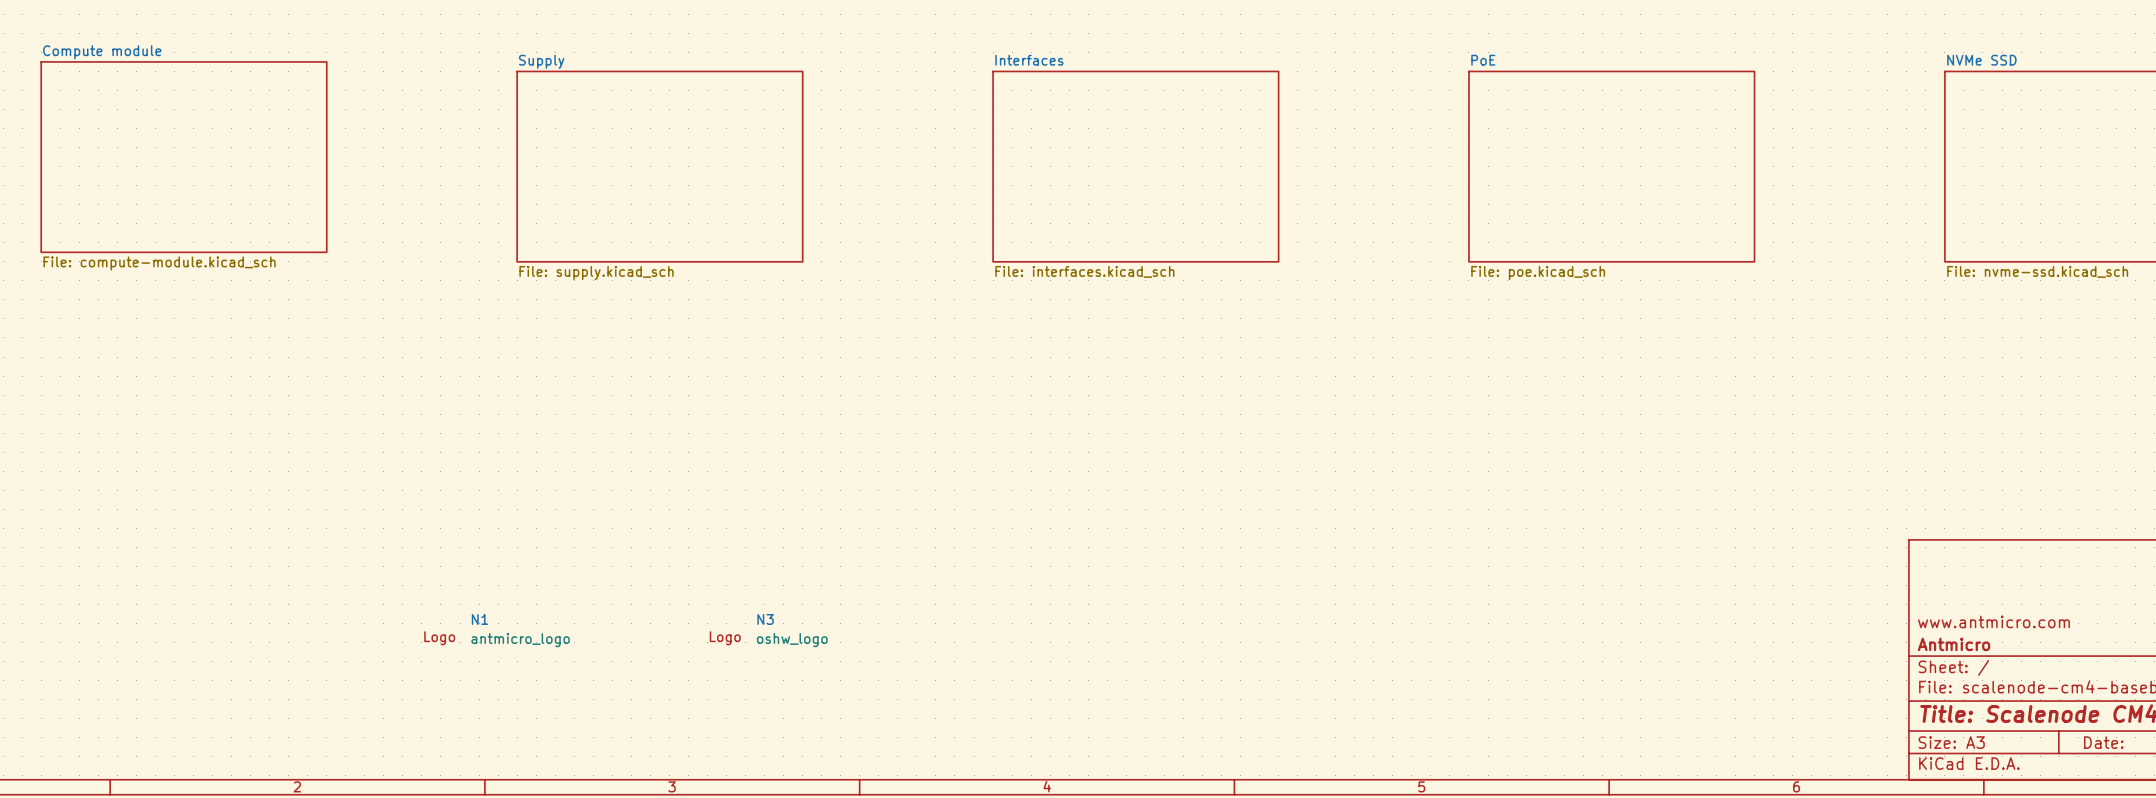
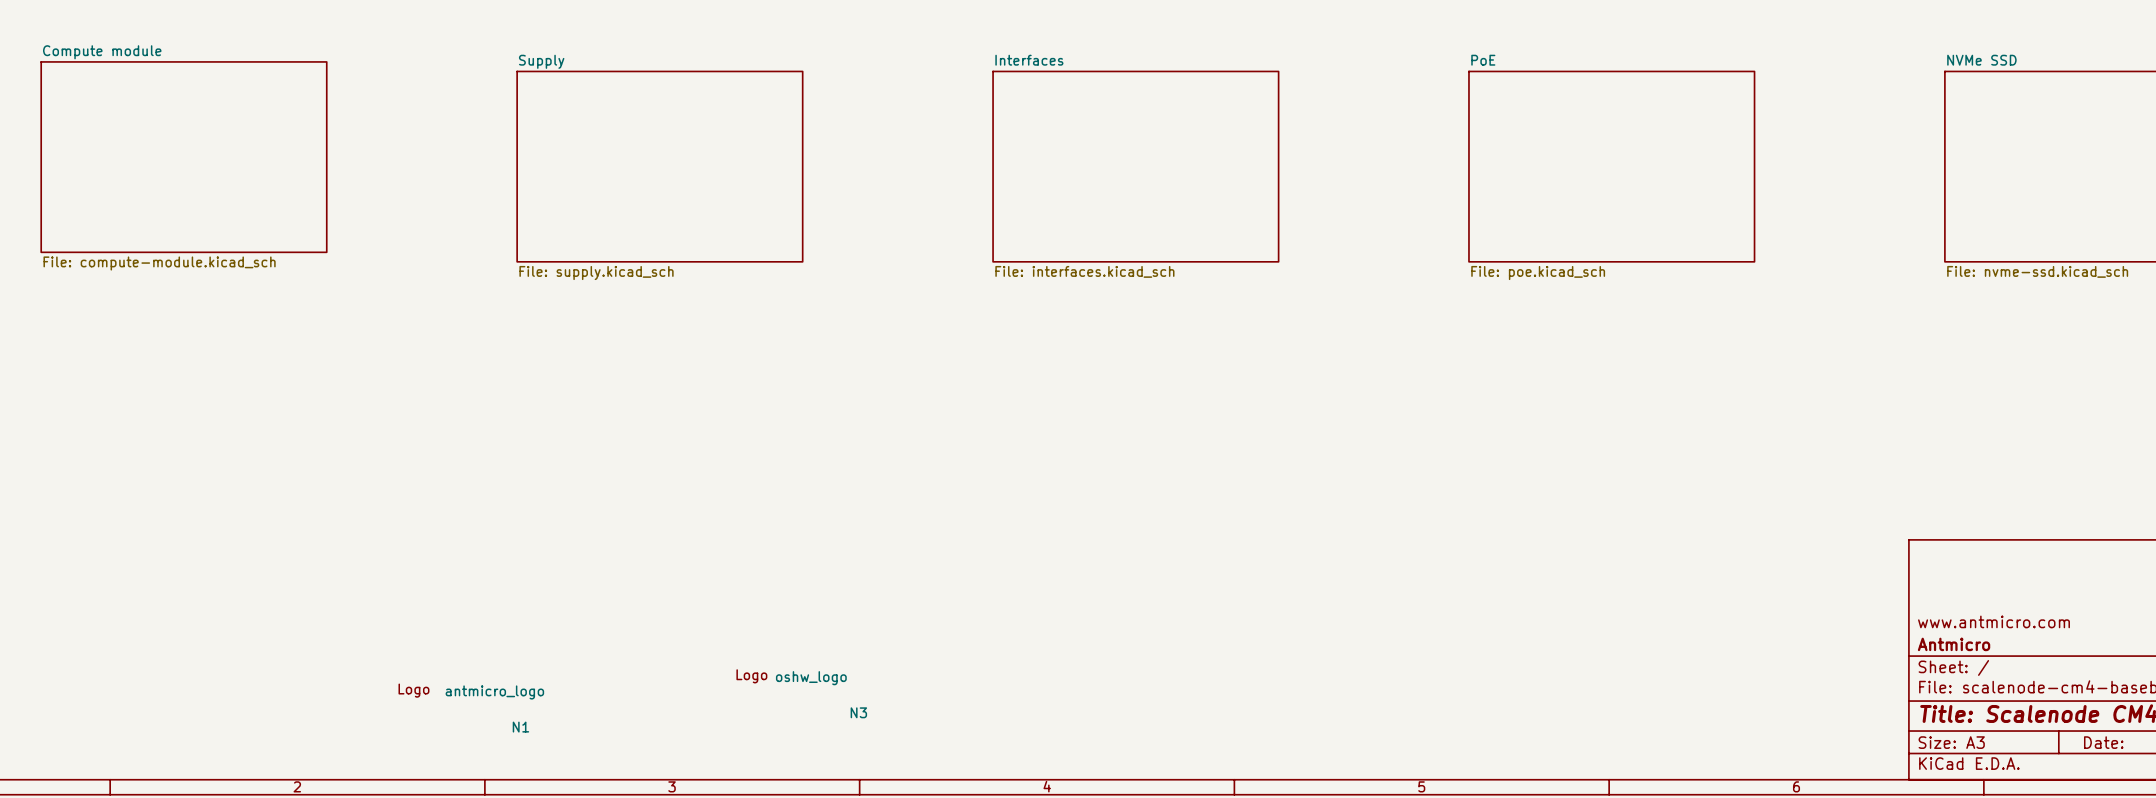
N1 name position: N1 (480, 619) -> N1 (520, 727)
N3 name position: N3 (765, 619) -> N3 (858, 712)
N1 position: (497, 630) -> (471, 708)
N3 position: (768, 630) -> (801, 693)
N3 value position: oshw_logo (792, 640) -> oshw_logo (811, 678)

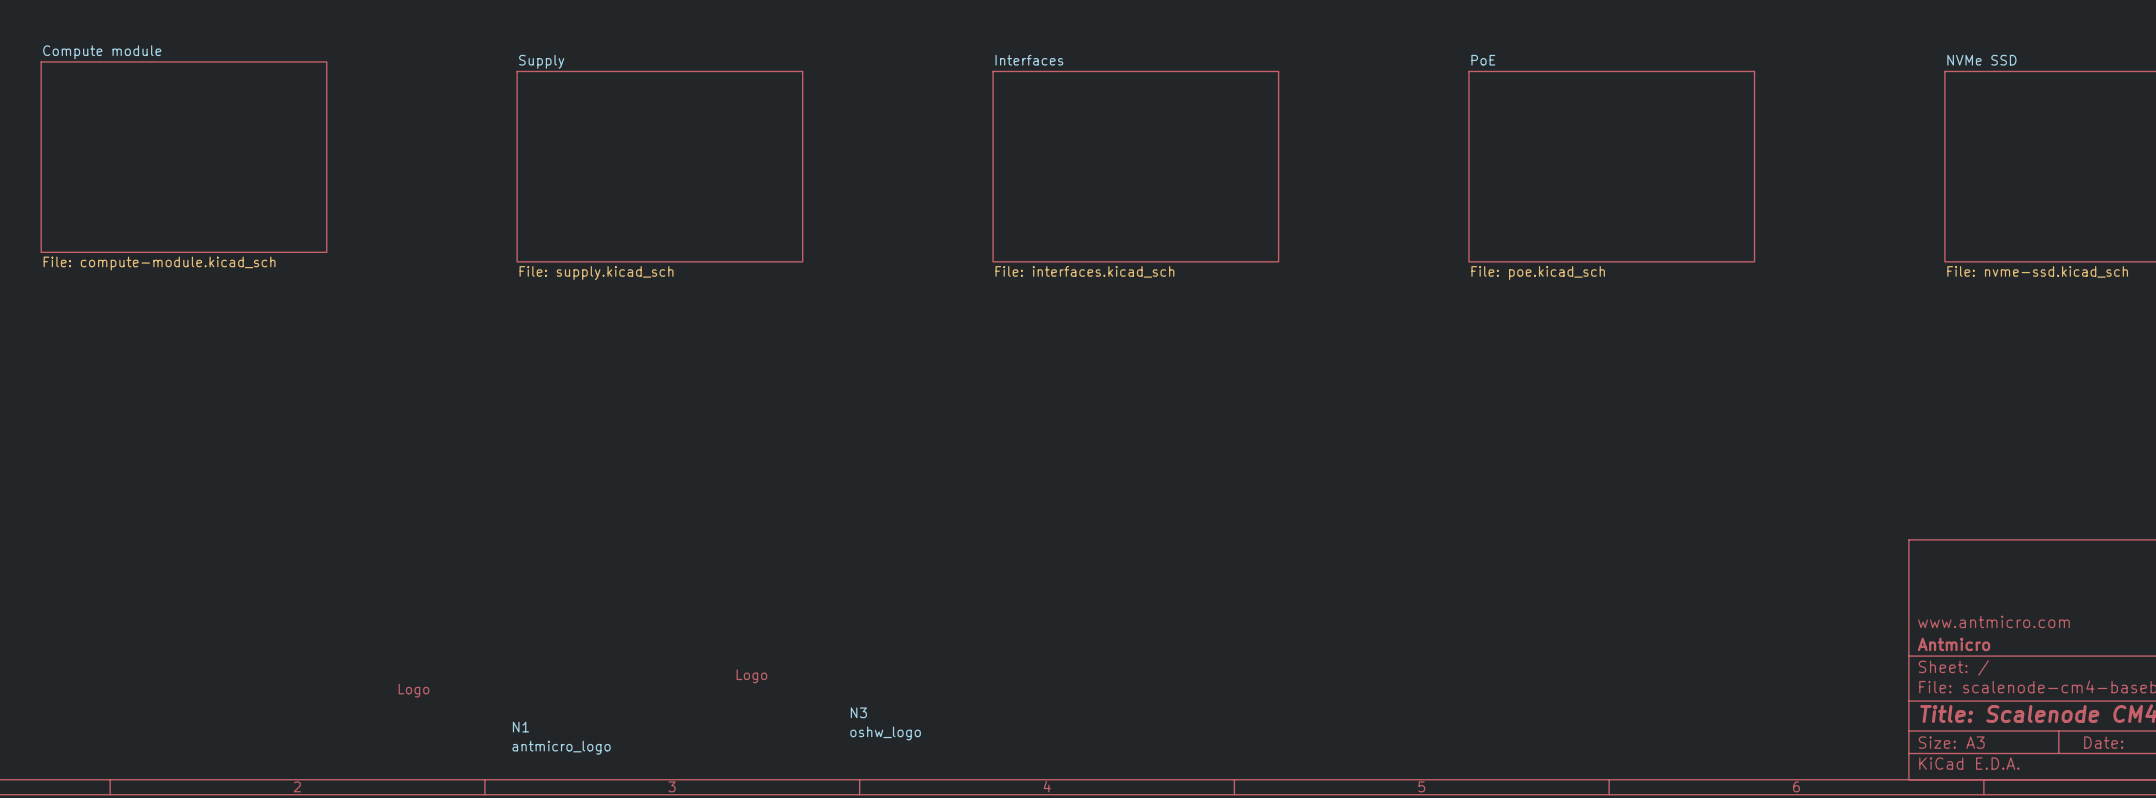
N3 value position: oshw_logo (811, 678) -> oshw_logo (885, 733)
N1 value position: antmicro_logo (494, 692) -> antmicro_logo (561, 747)

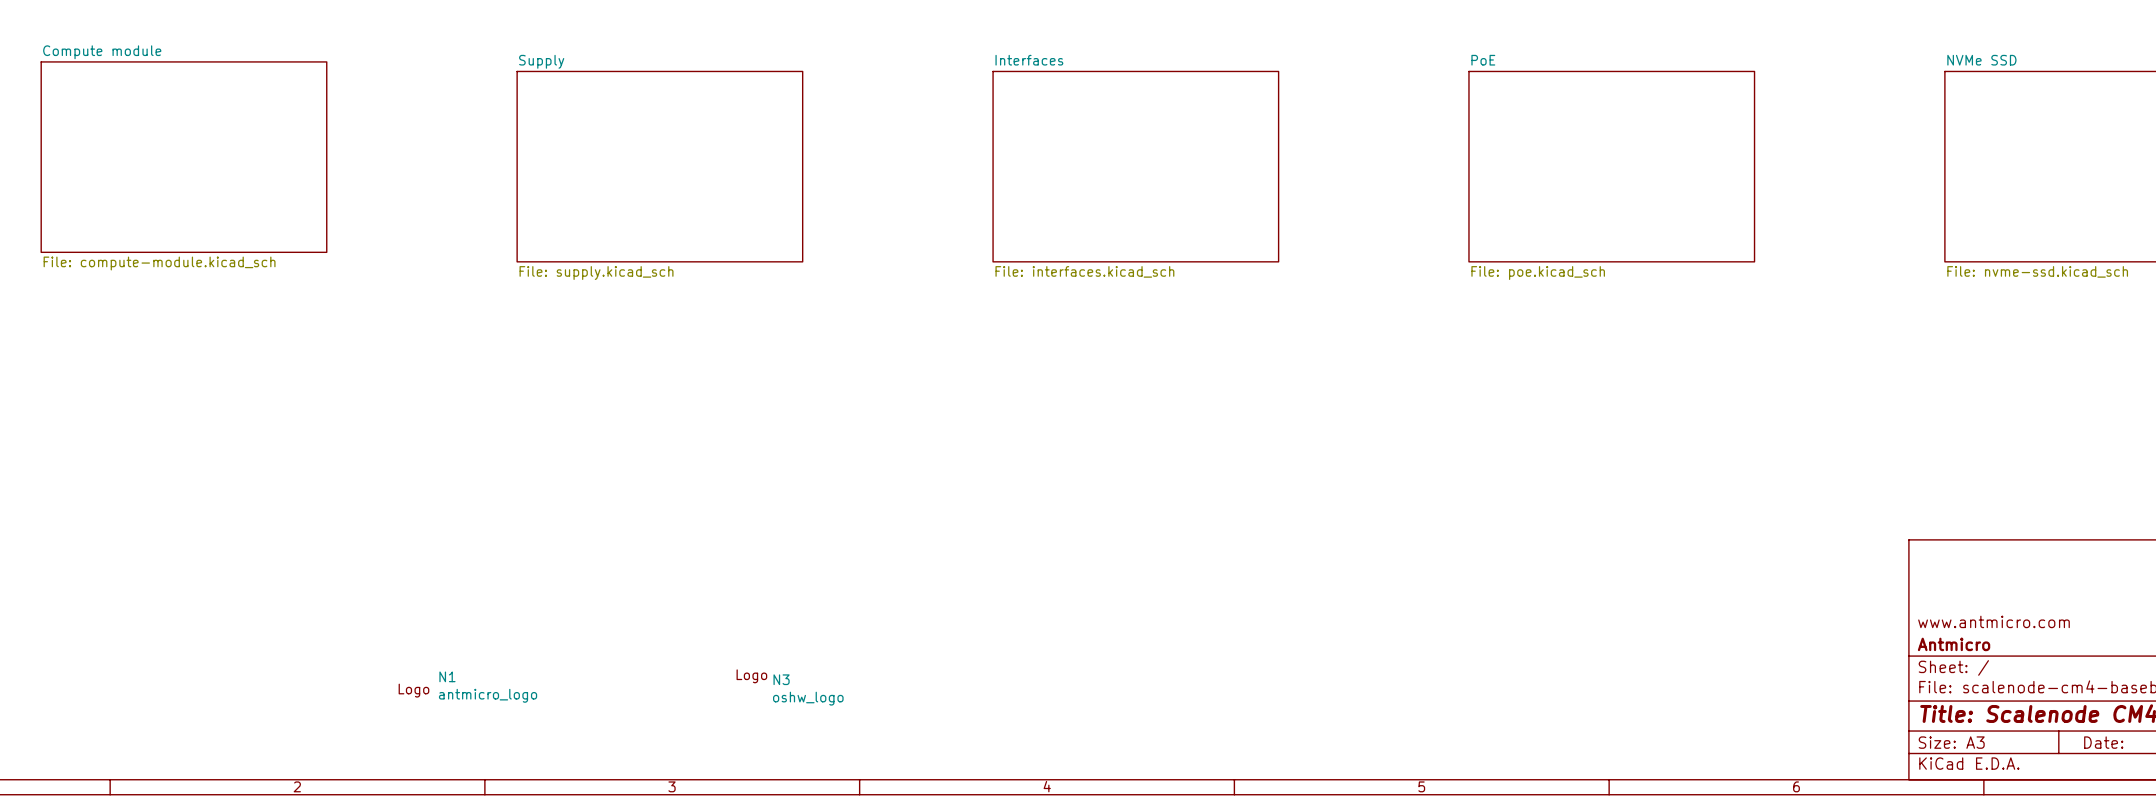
N3 name position: N3 (858, 712) -> N3 (781, 679)
N1 name position: N1 (520, 727) -> N1 (447, 676)
N3 value position: oshw_logo (885, 733) -> oshw_logo (808, 698)
N1 value position: antmicro_logo (561, 747) -> antmicro_logo (488, 695)

